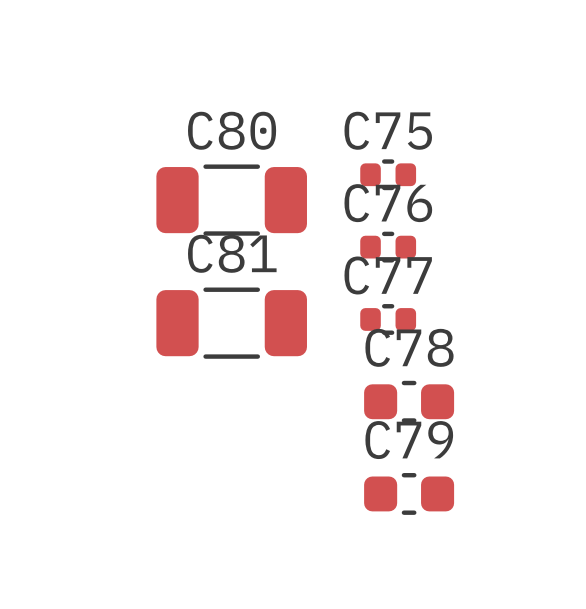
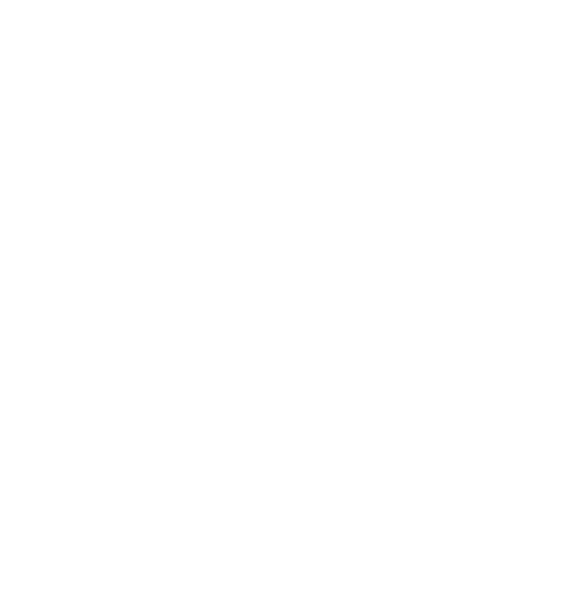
C75: (388, 174) -> none
C80: (231, 200) -> none
C76: (388, 247) -> none
C77: (388, 319) -> none
C81: (231, 323) -> none
C78: (409, 401) -> none
C79: (409, 493) -> none

